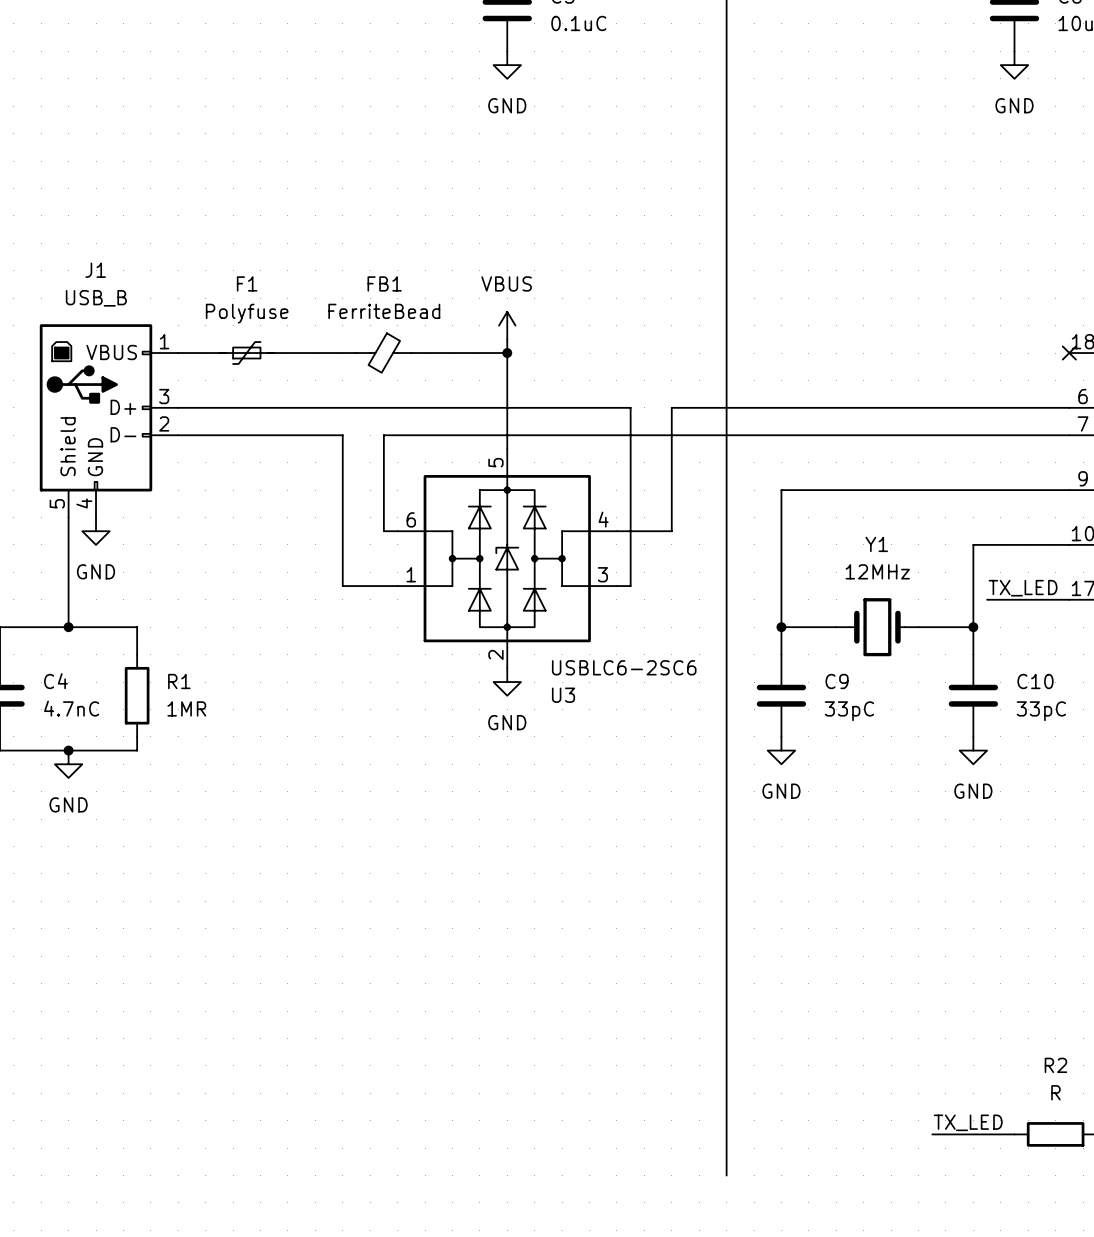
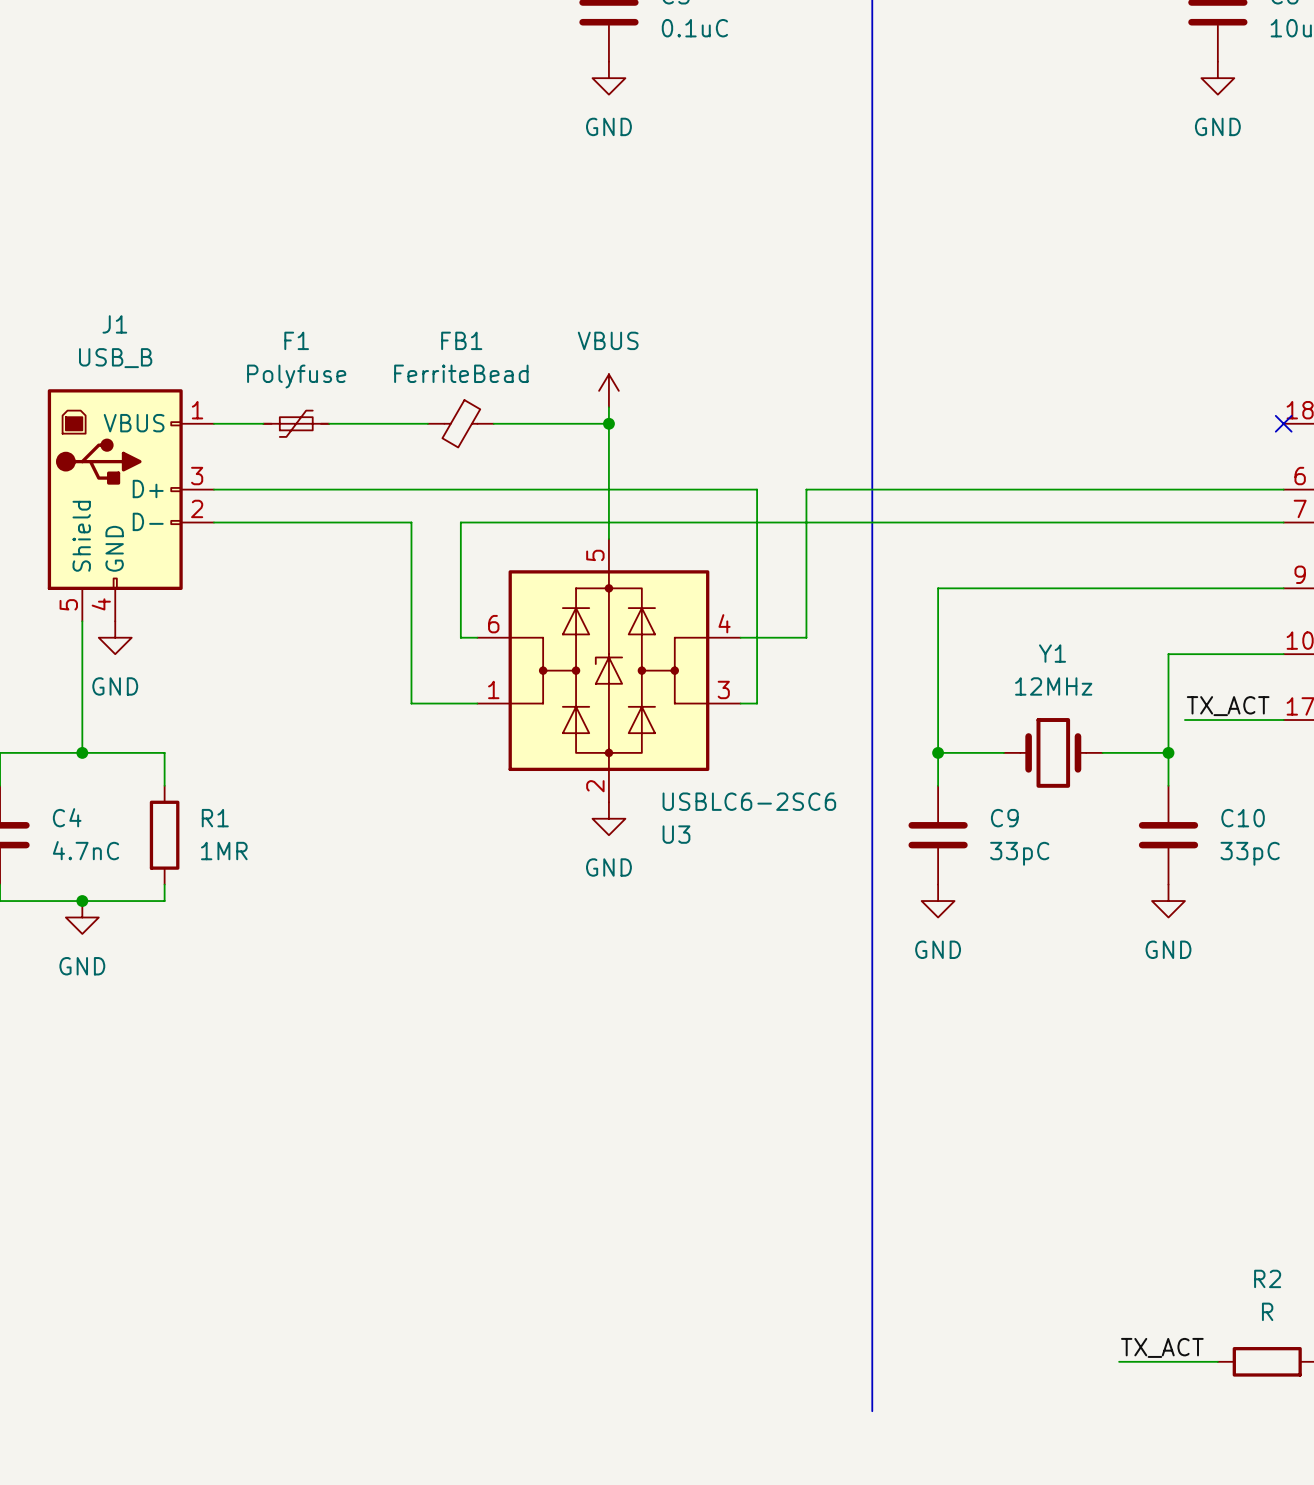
label: TX_LED (1023, 588) -> TX_ACT (1228, 706)
label: TX_LED (968, 1122) -> TX_ACT (1162, 1347)

